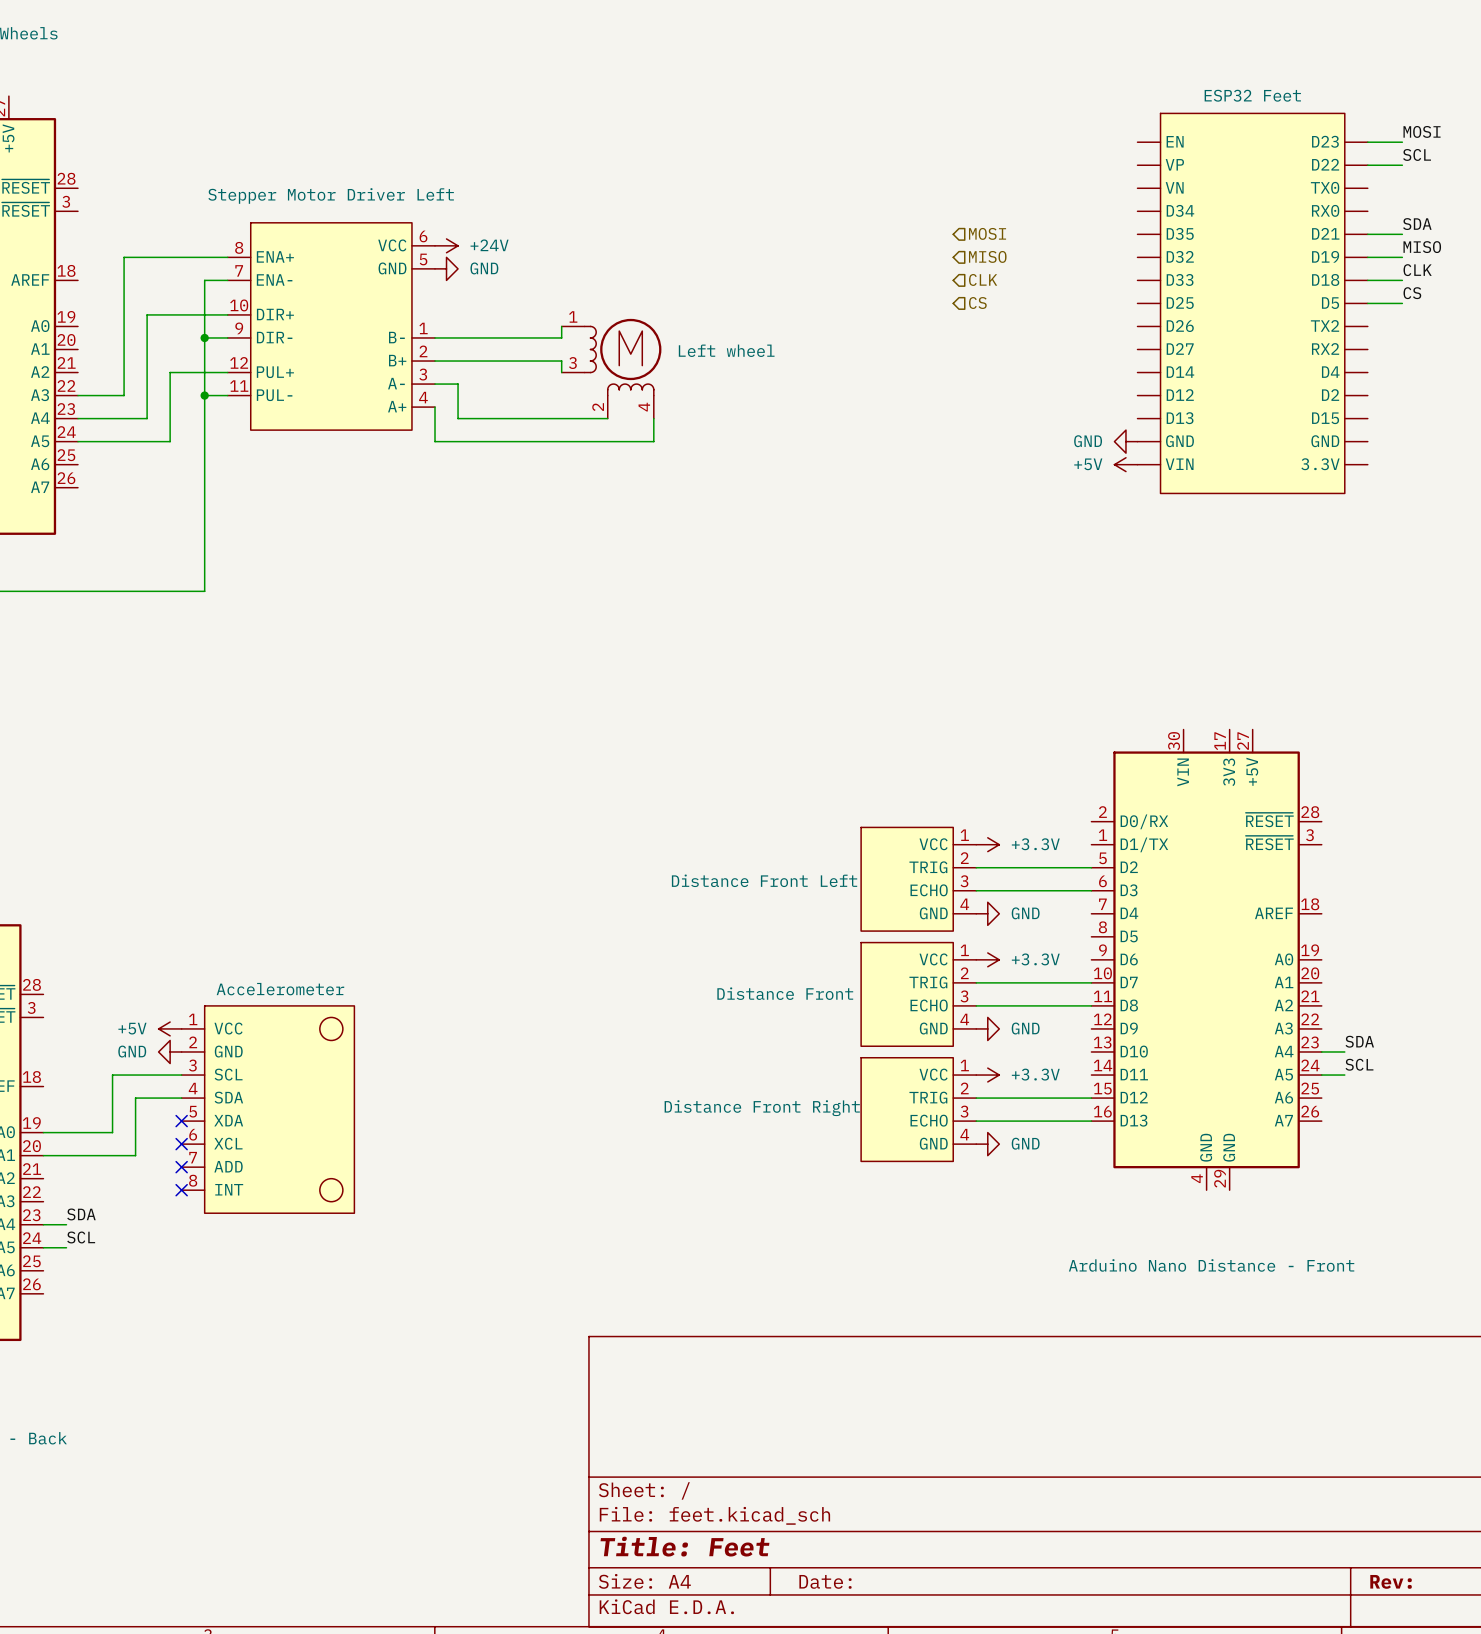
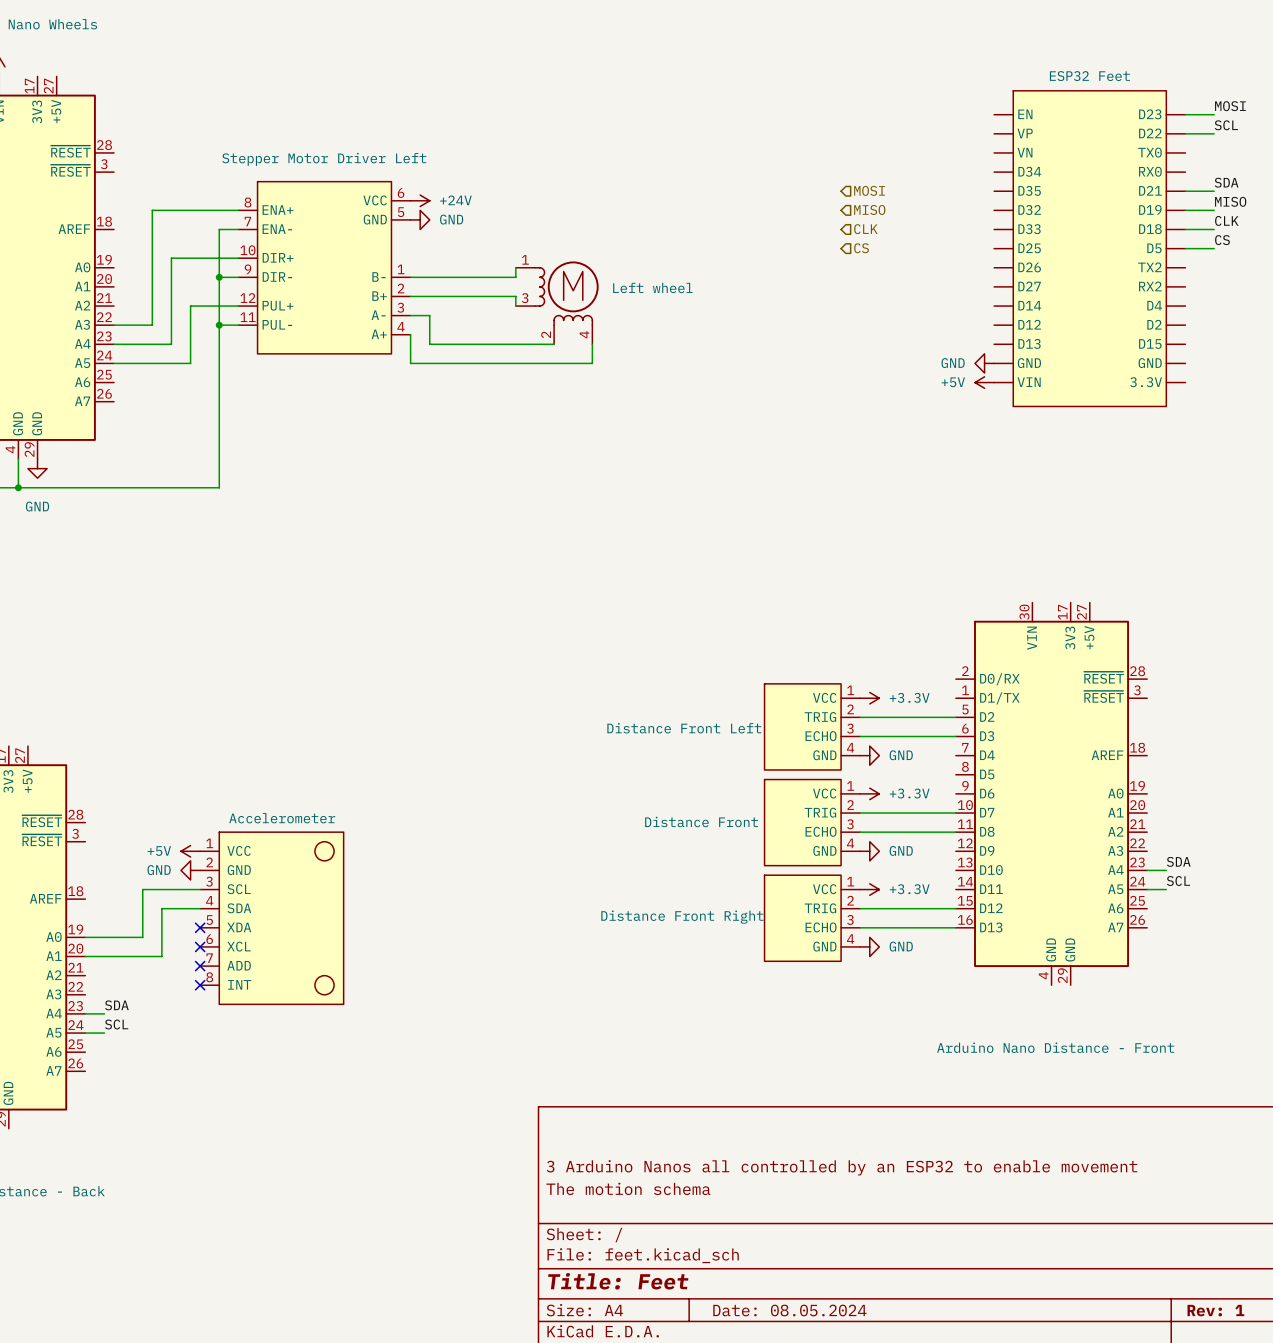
title block: none -> 3 Arduino Nanos all controlled by an ESP32 to enable movement (842, 1167)
title block: none -> The motion schema (628, 1188)
title block: Date: (825, 1581) -> Date: 08.05.2024 (789, 1310)
title block: Rev: (1391, 1581) -> Rev: 1 (1215, 1310)

